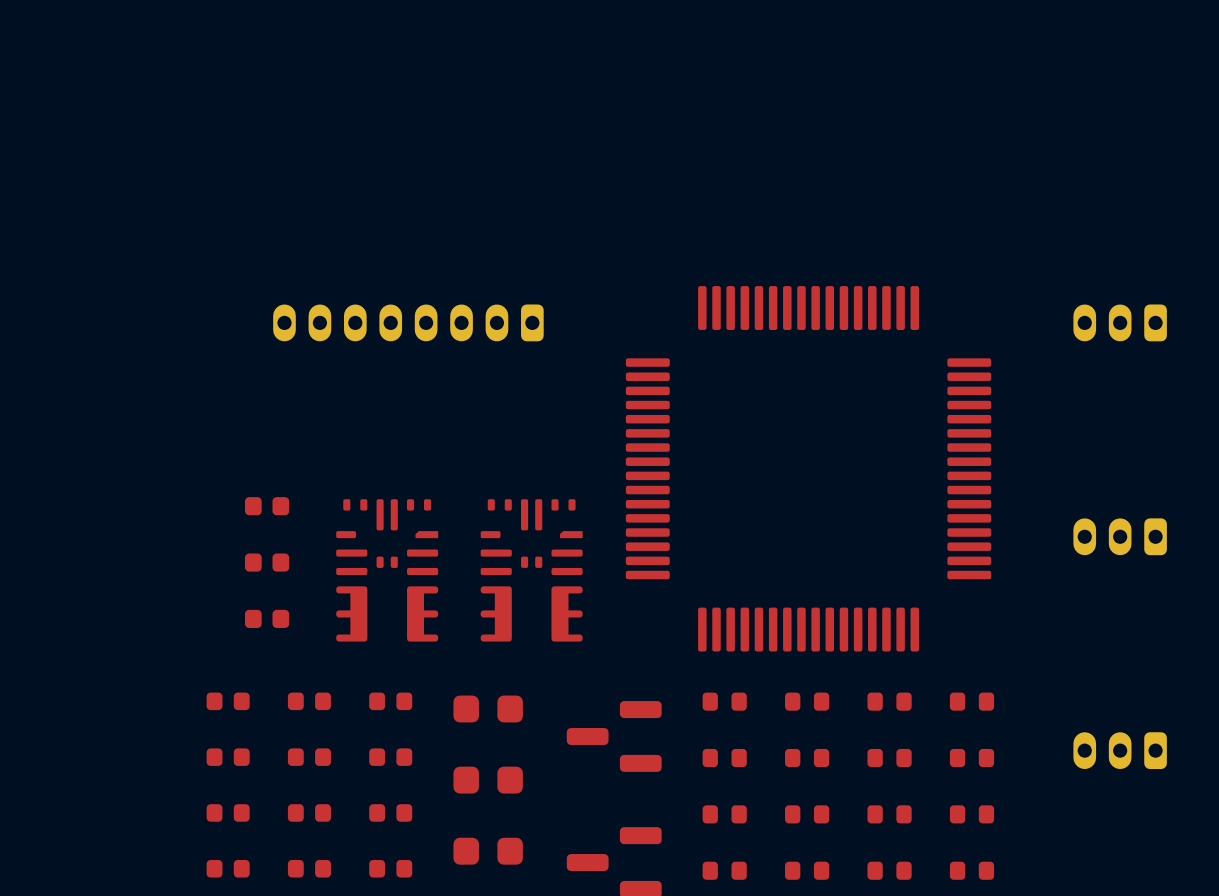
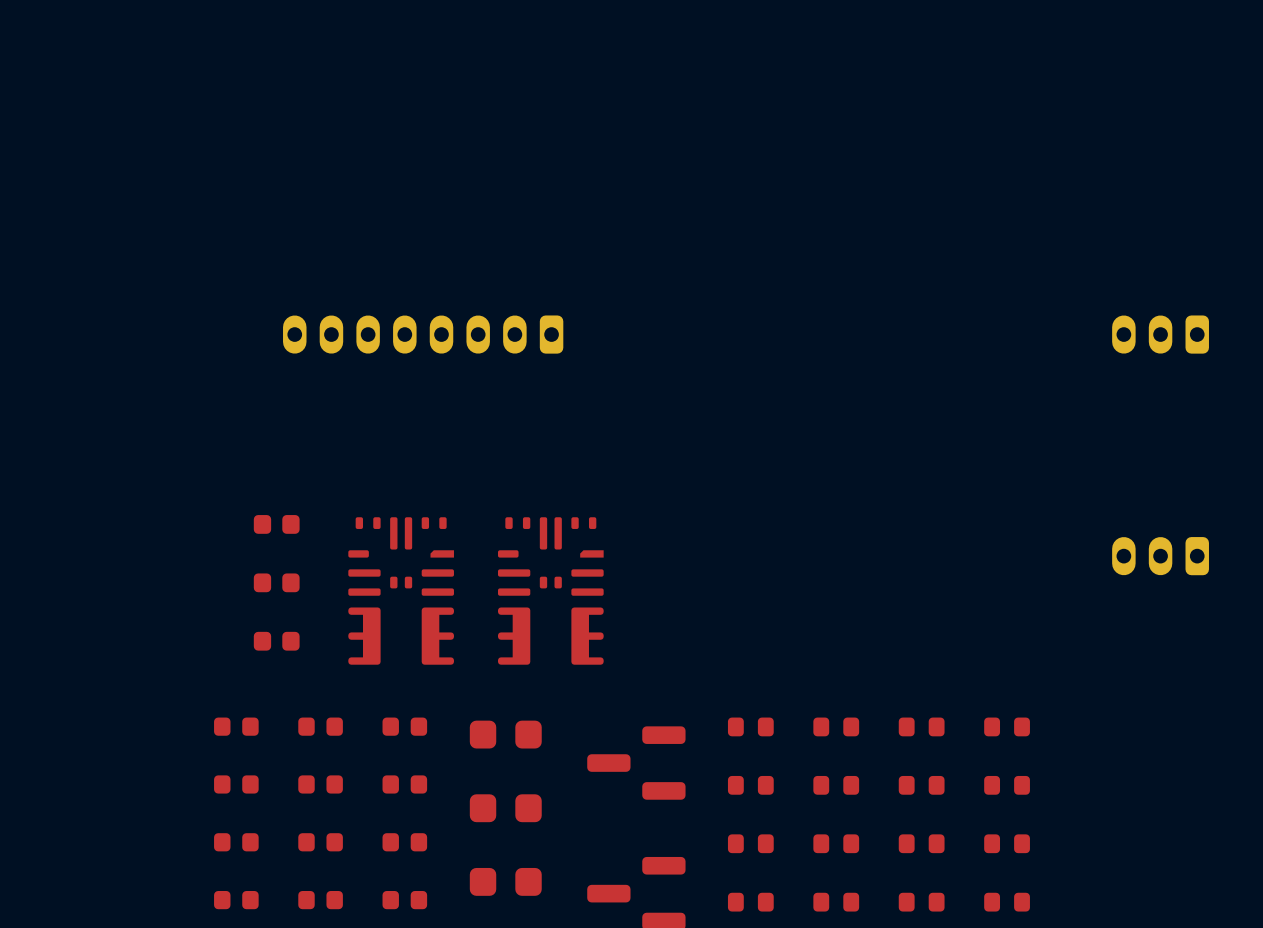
part: (808, 468) -> none
part: (1120, 750) -> none

